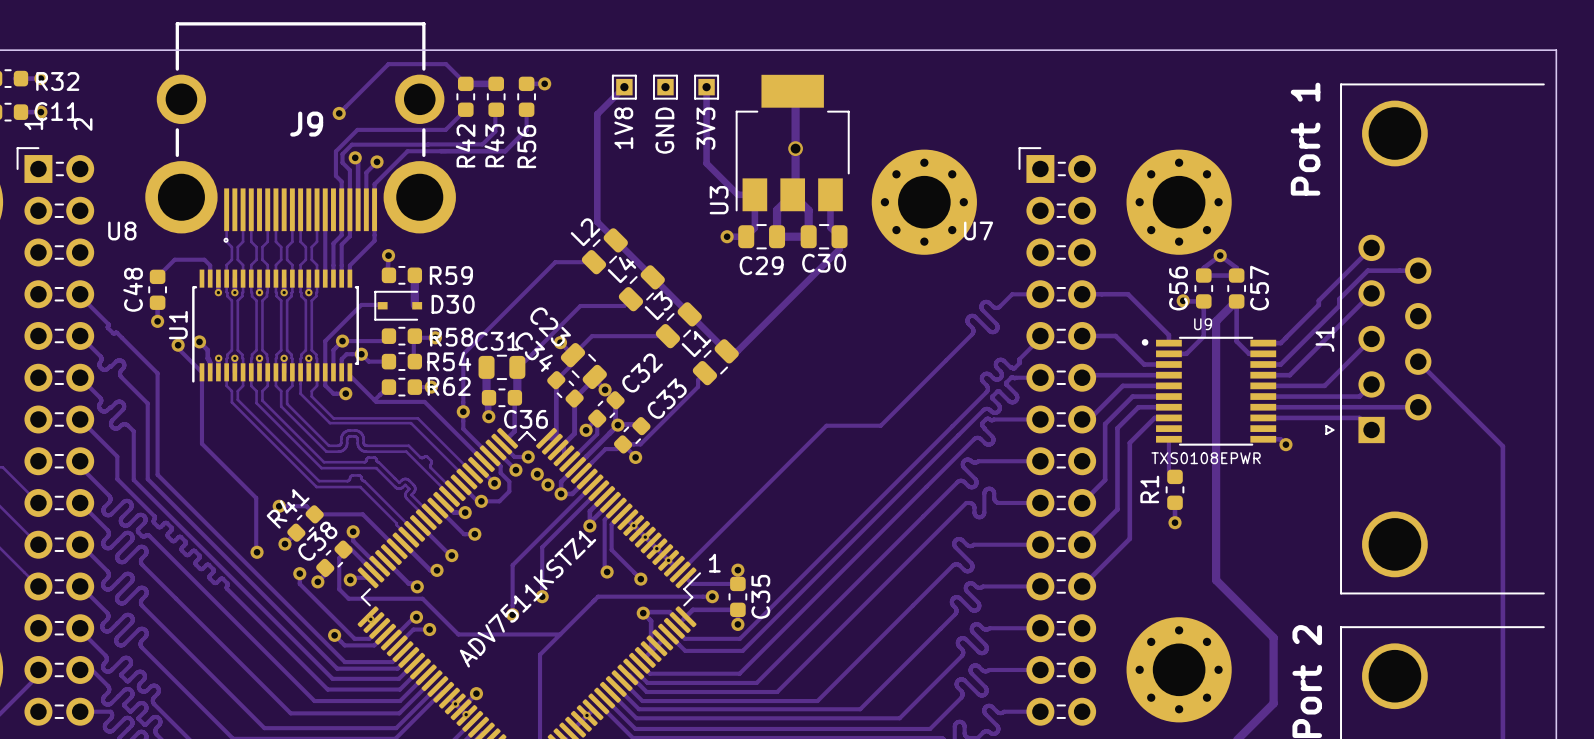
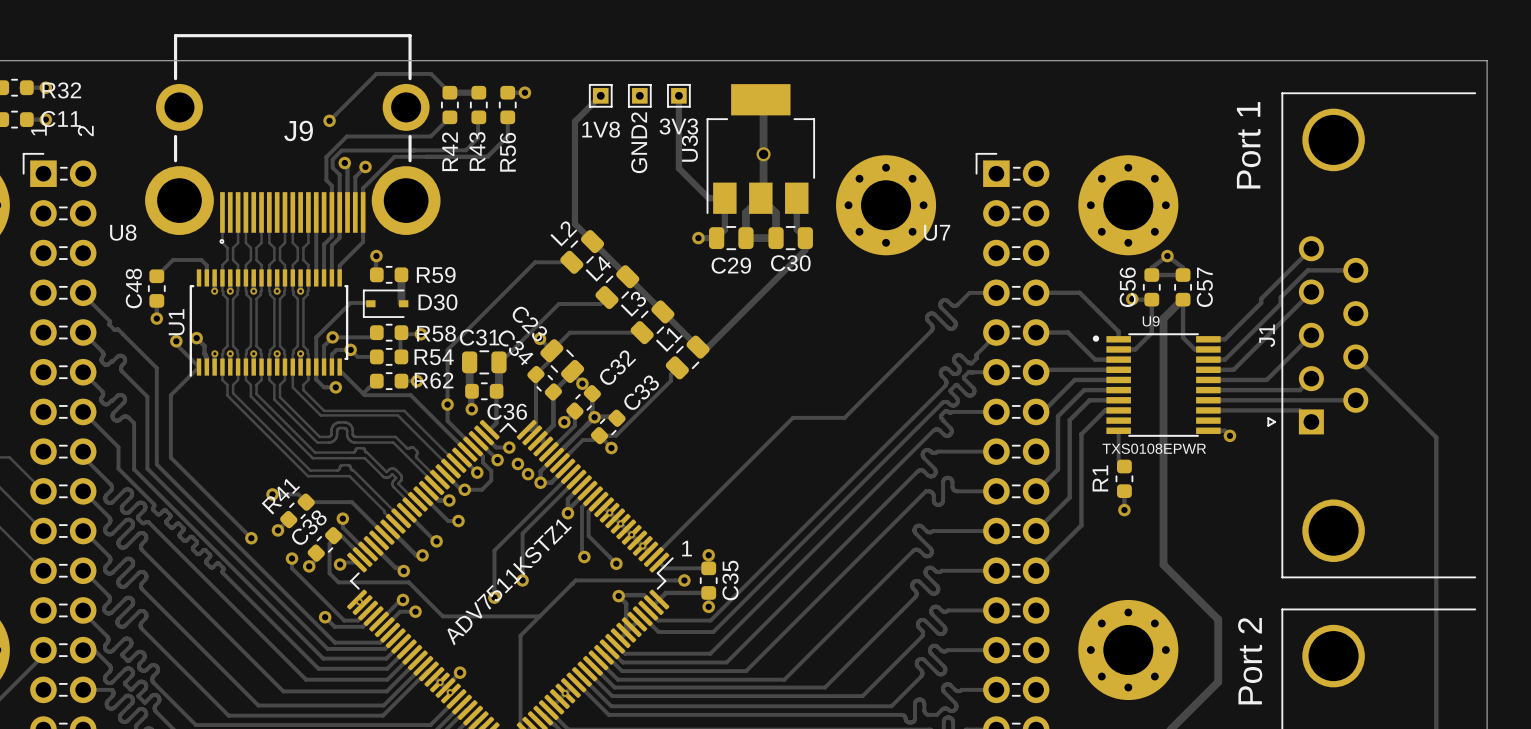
1V8 name rotation: 0° (623, 128) -> 90° clockwise (601, 129)
3V3 name rotation: 0° (705, 128) -> 90° clockwise (678, 126)
GND2 value: GND (664, 130) -> none
GND2 name: none -> GND2 (639, 142)
U3 name position: U3 (719, 200) -> U3 (689, 148)
track: (201, 372) (201, 443) (256, 498) (256, 551) -> (199, 367) (170, 395) (170, 457) (250, 537)

